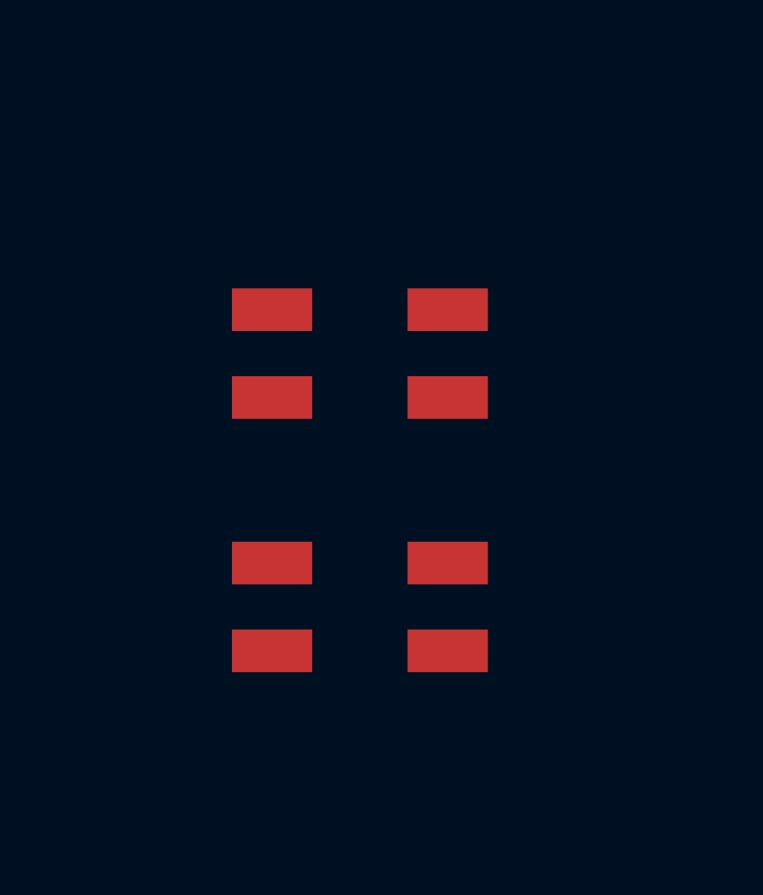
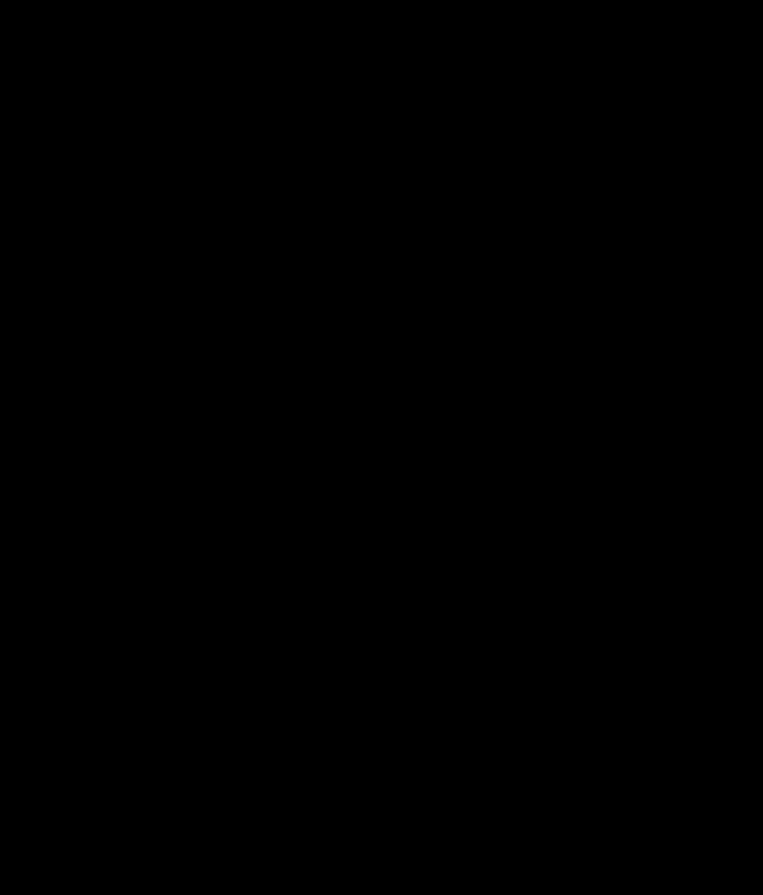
part: (359, 353) -> none
part: (359, 606) -> none

